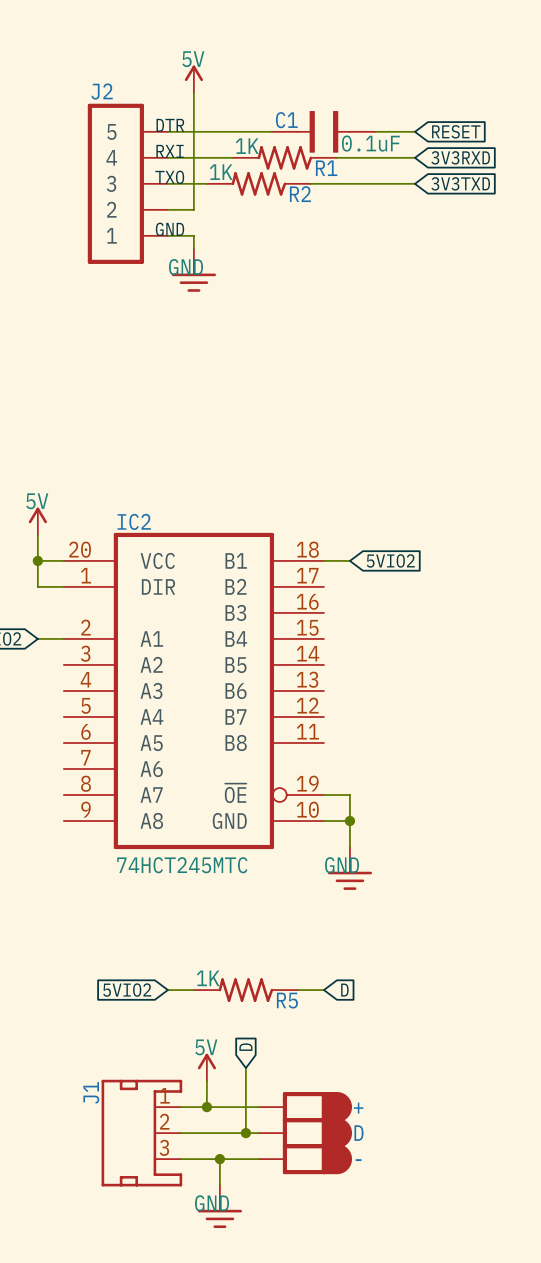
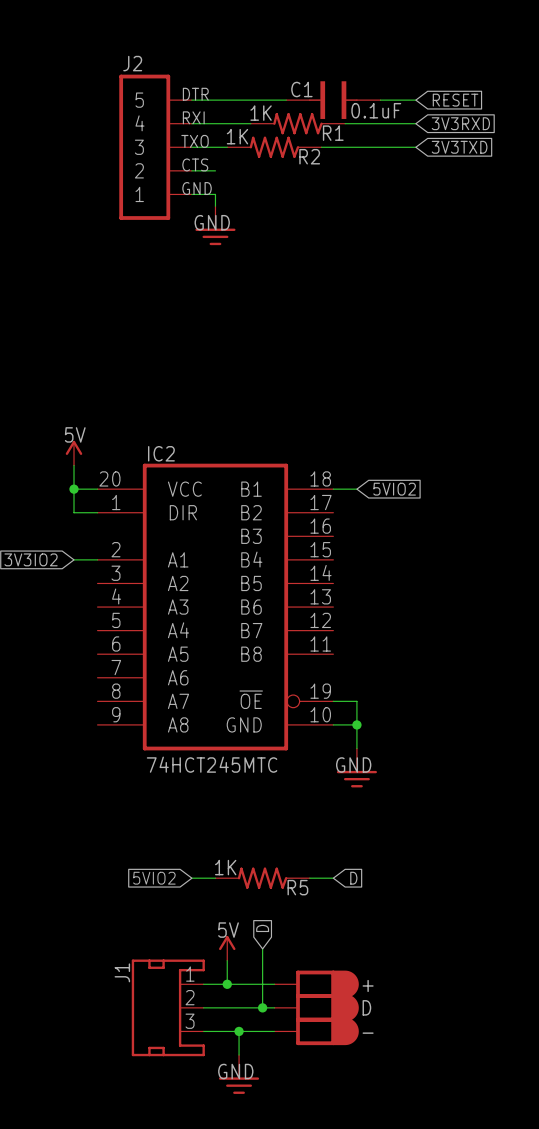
power symbol: (193, 79) -> none
wire: (193, 92) (193, 209) -> none
label: none -> CTS (195, 164)

